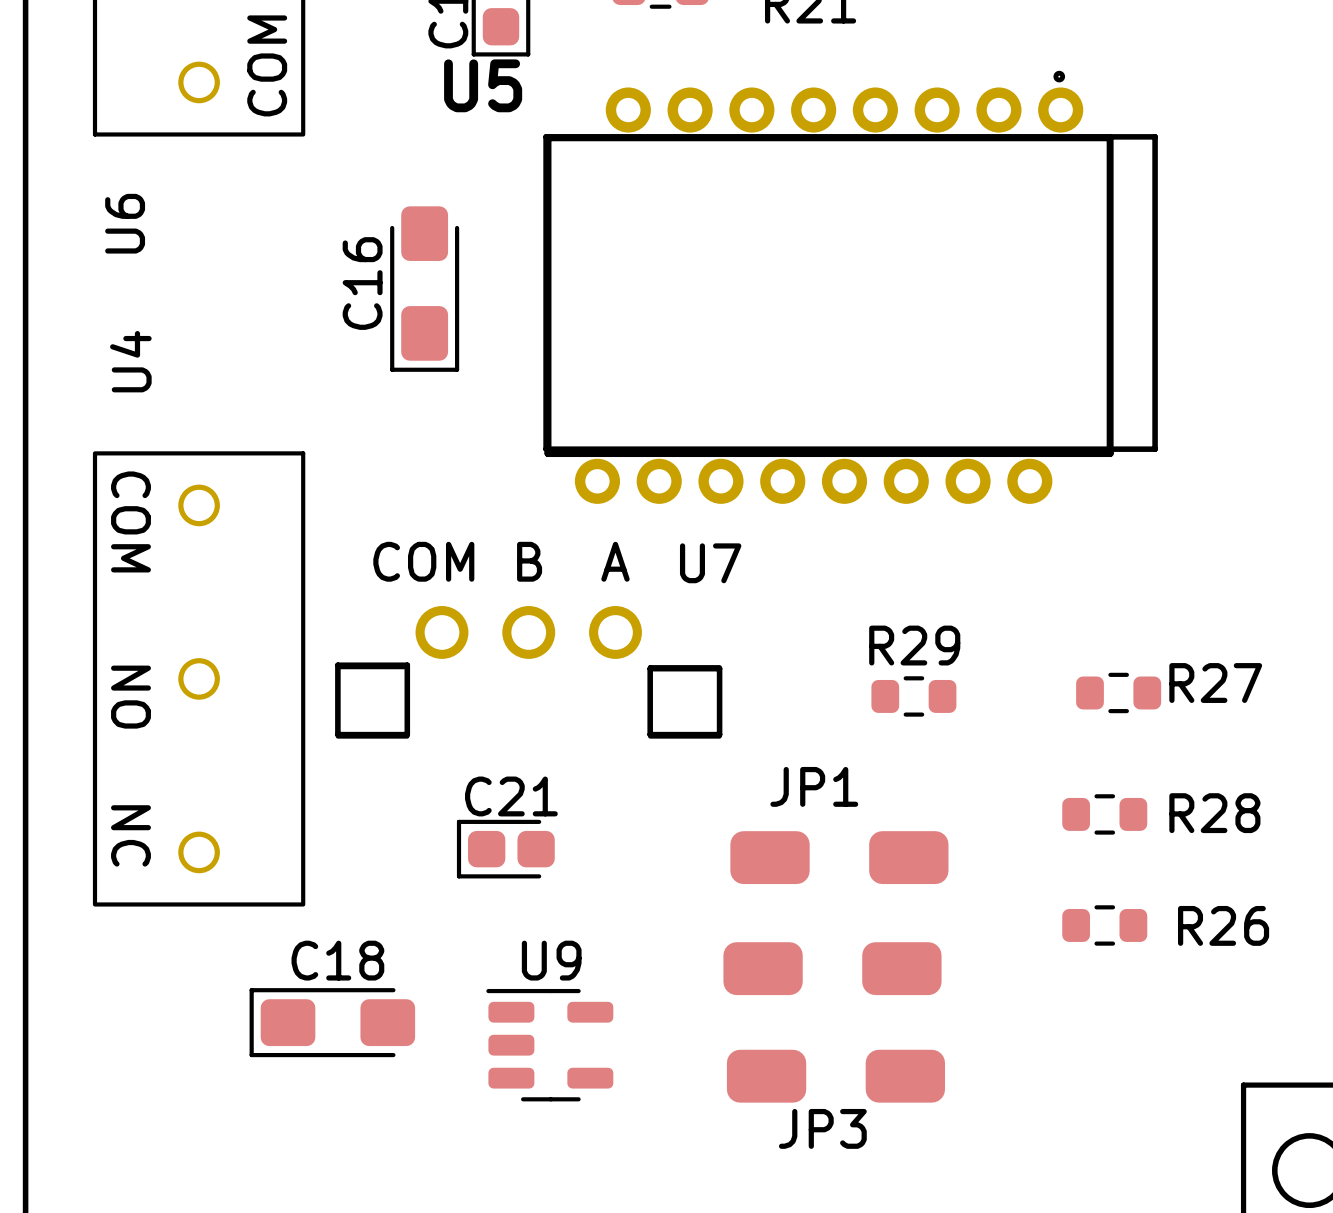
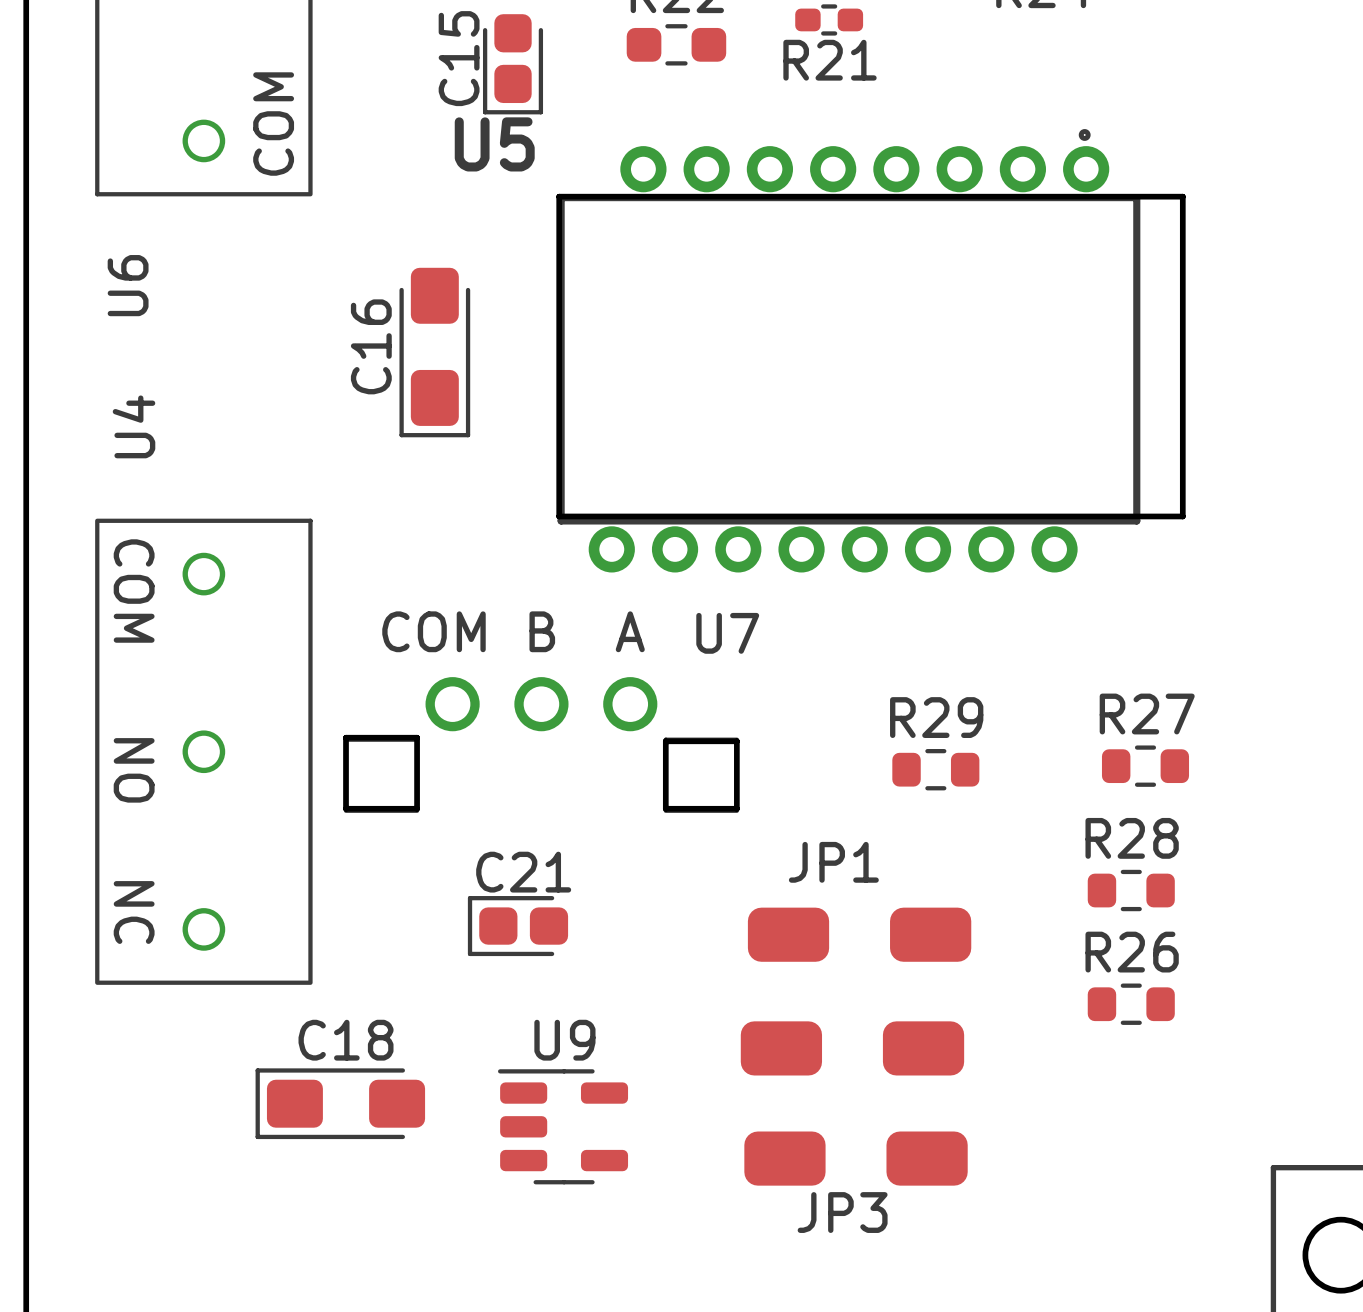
R27 name position: R27 (1215, 683) -> R27 (1147, 714)
R28 name position: R28 (1214, 813) -> R28 (1132, 838)
R26 name position: R26 (1223, 925) -> R26 (1132, 952)

